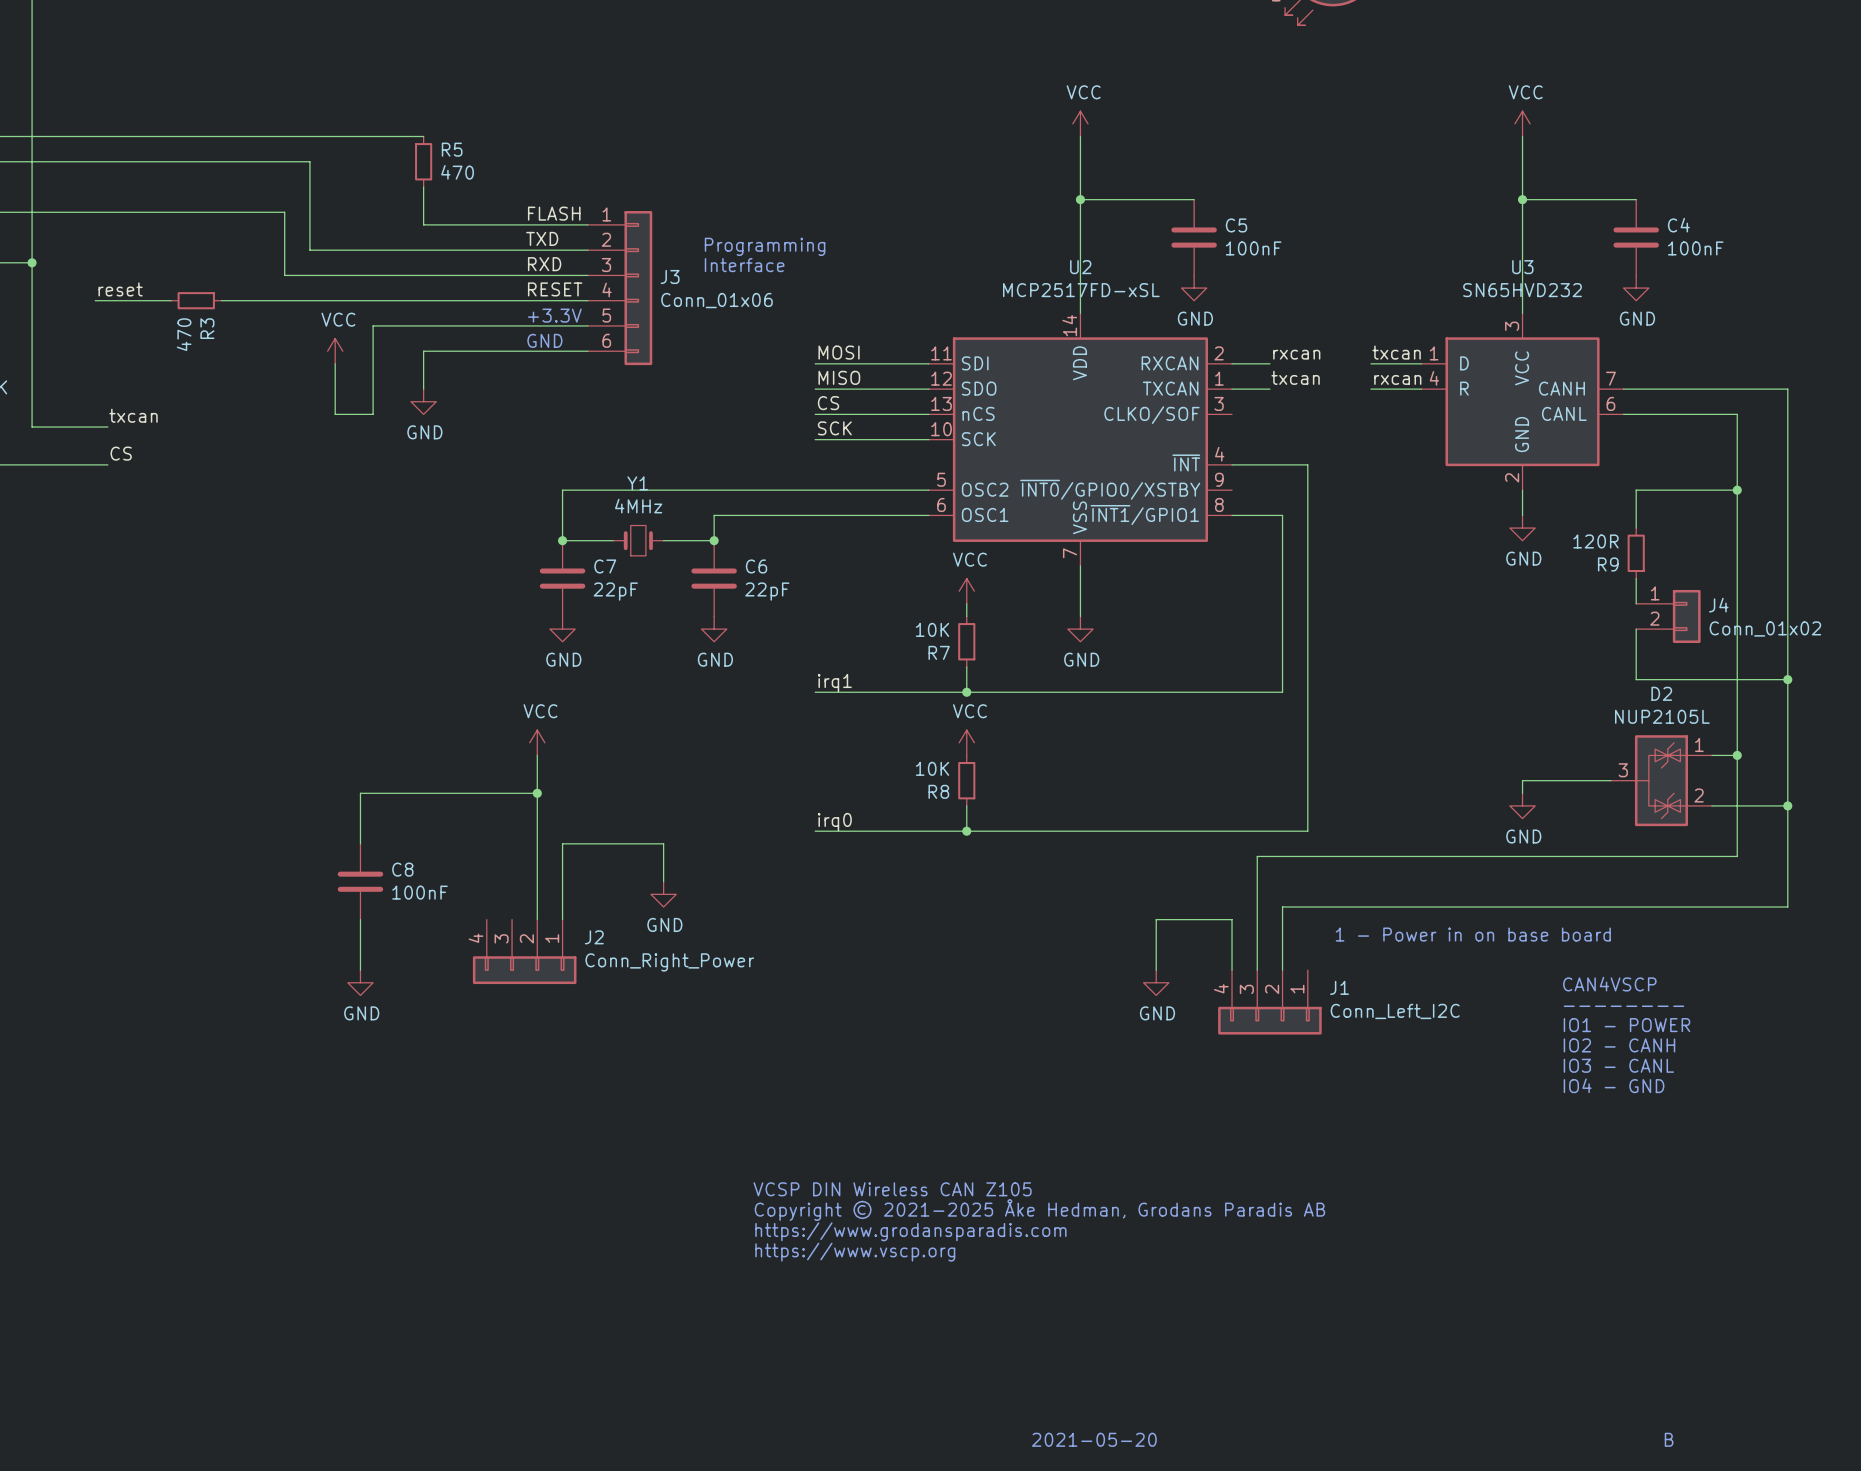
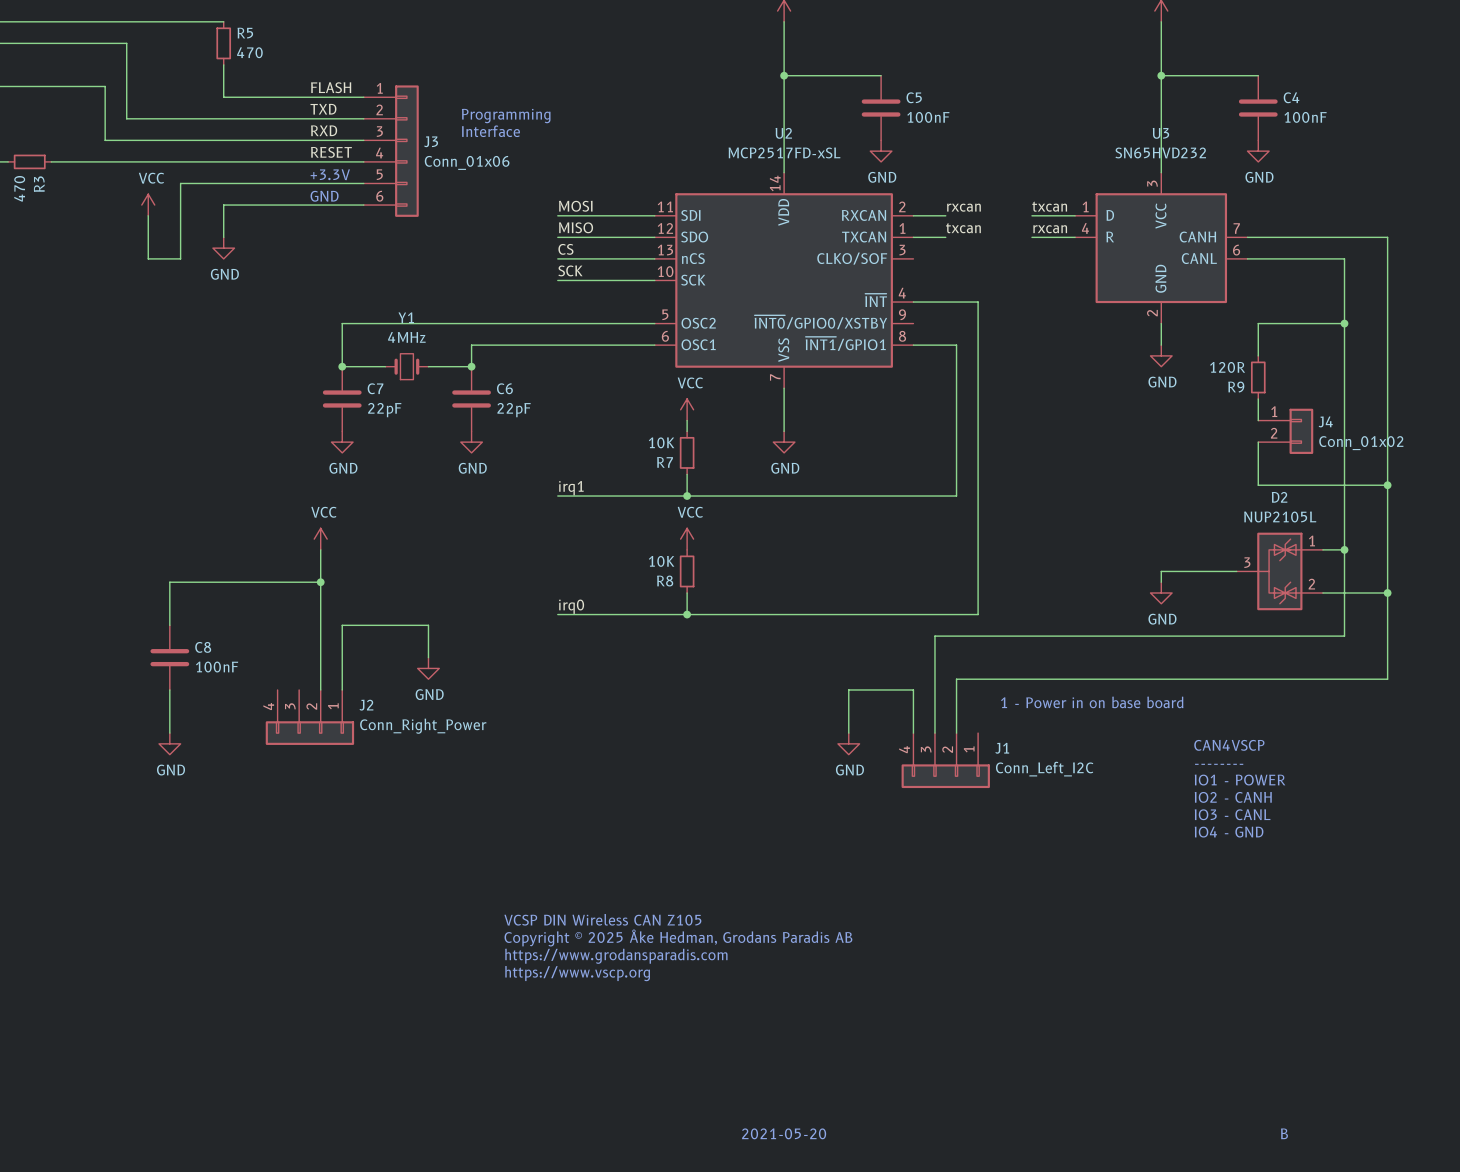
text: Copyright © 2021-2025 Åke Hedman, Grodans Paradis AB (1039, 1209) -> Copyright © 2025 Åke Hedman, Grodans Paradis AB (678, 937)

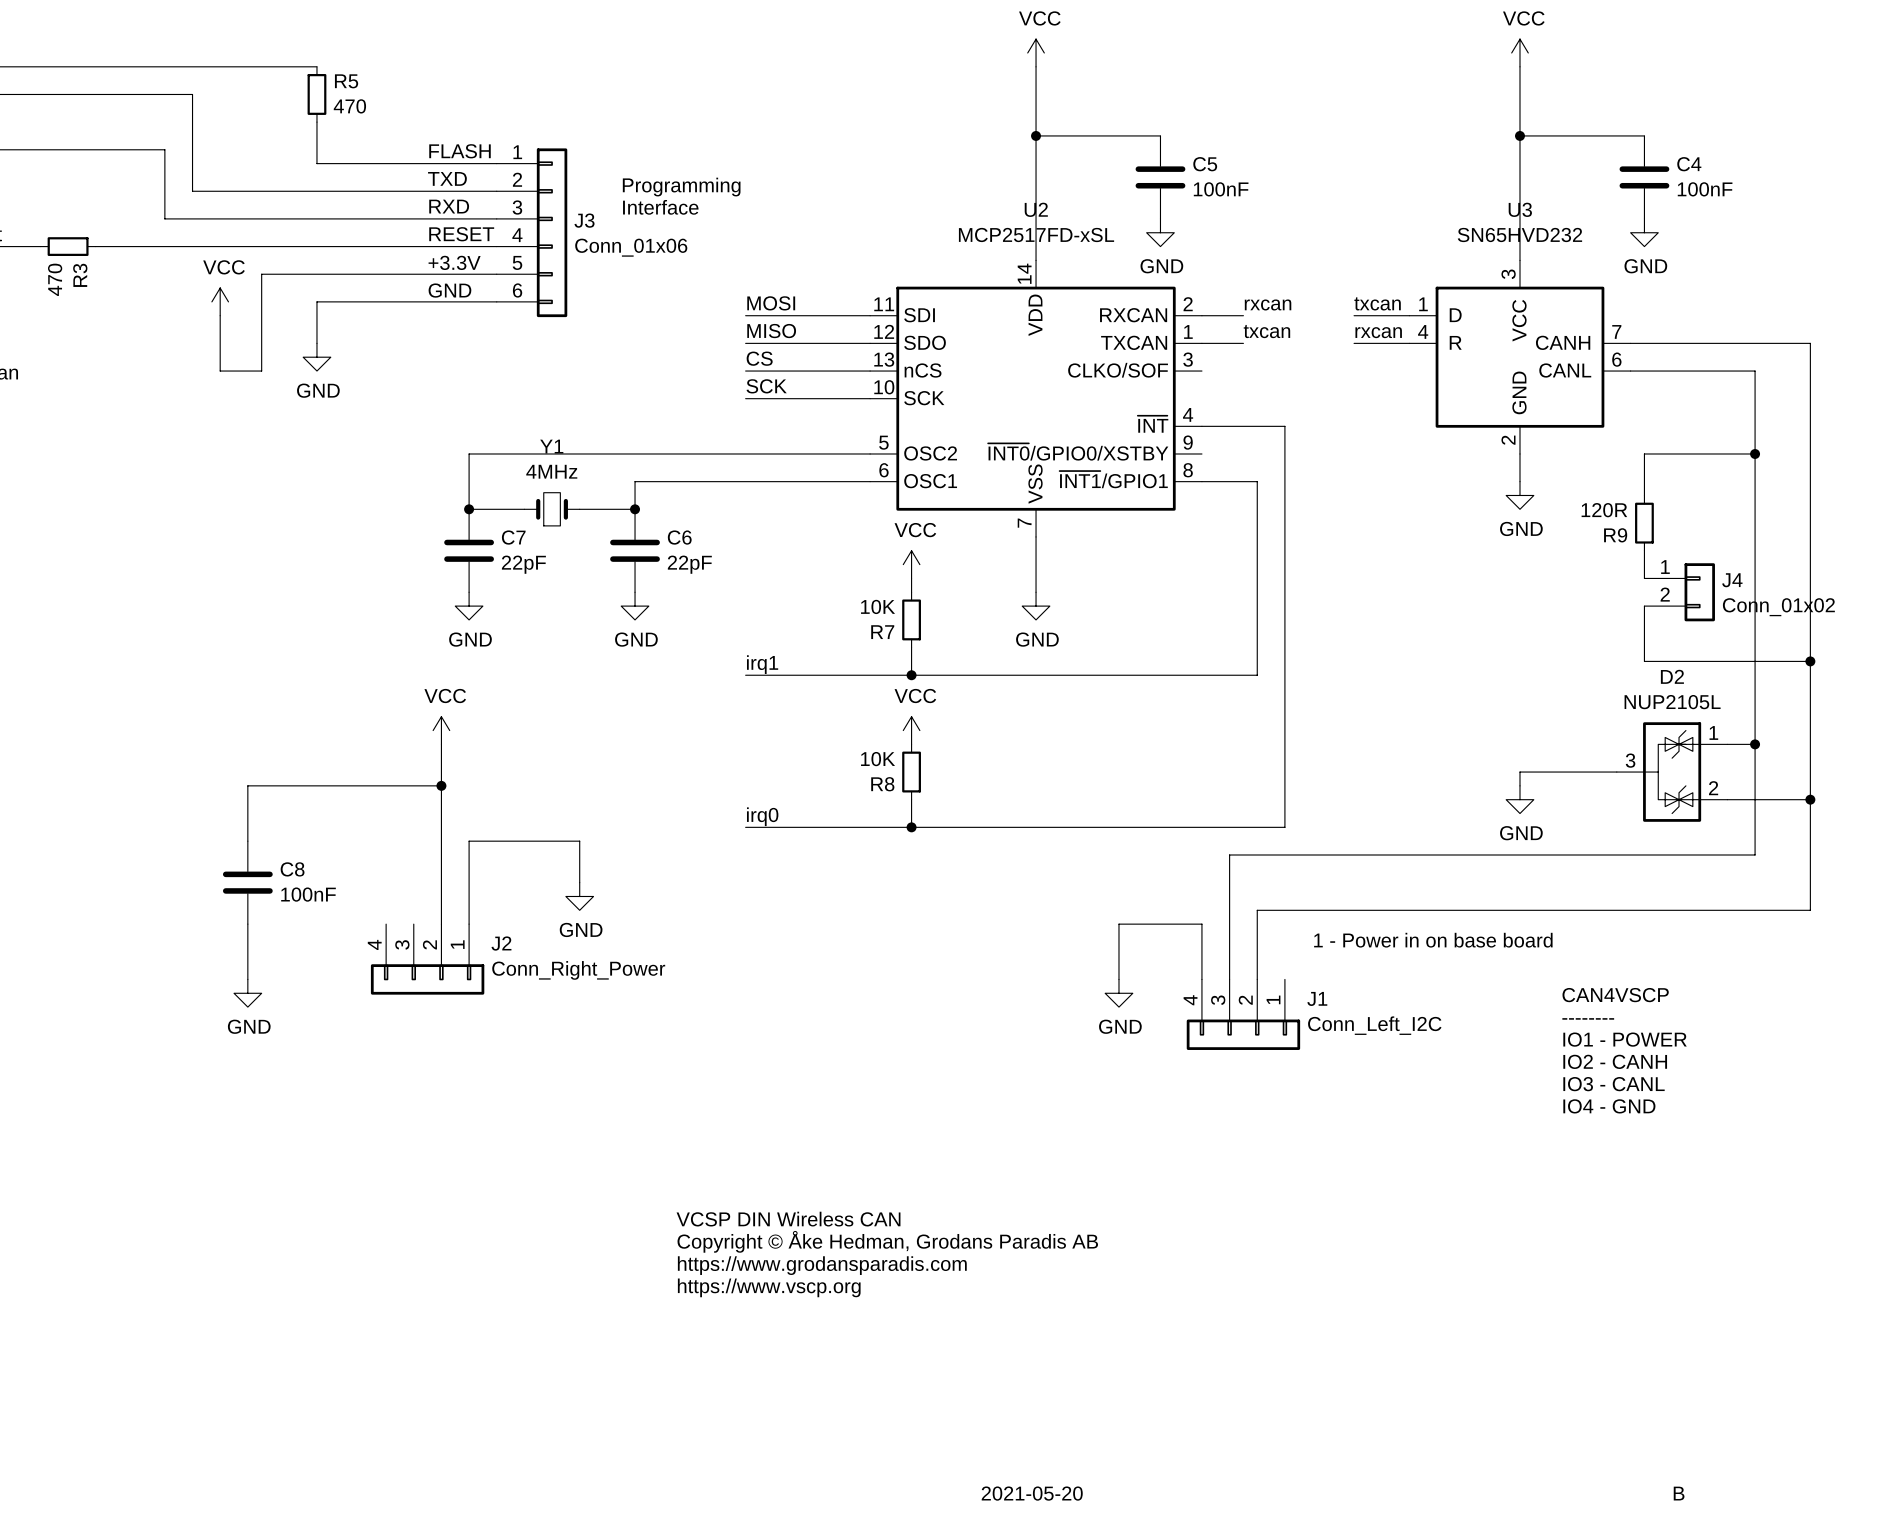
text: VCSP DIN Wireless CAN Z105 (602, 919) -> VCSP DIN Wireless CAN (788, 1219)
text: Copyright © 2025 Åke Hedman, Grodans Paradis AB (678, 937) -> Copyright © Åke Hedman, Grodans Paradis AB (887, 1241)

